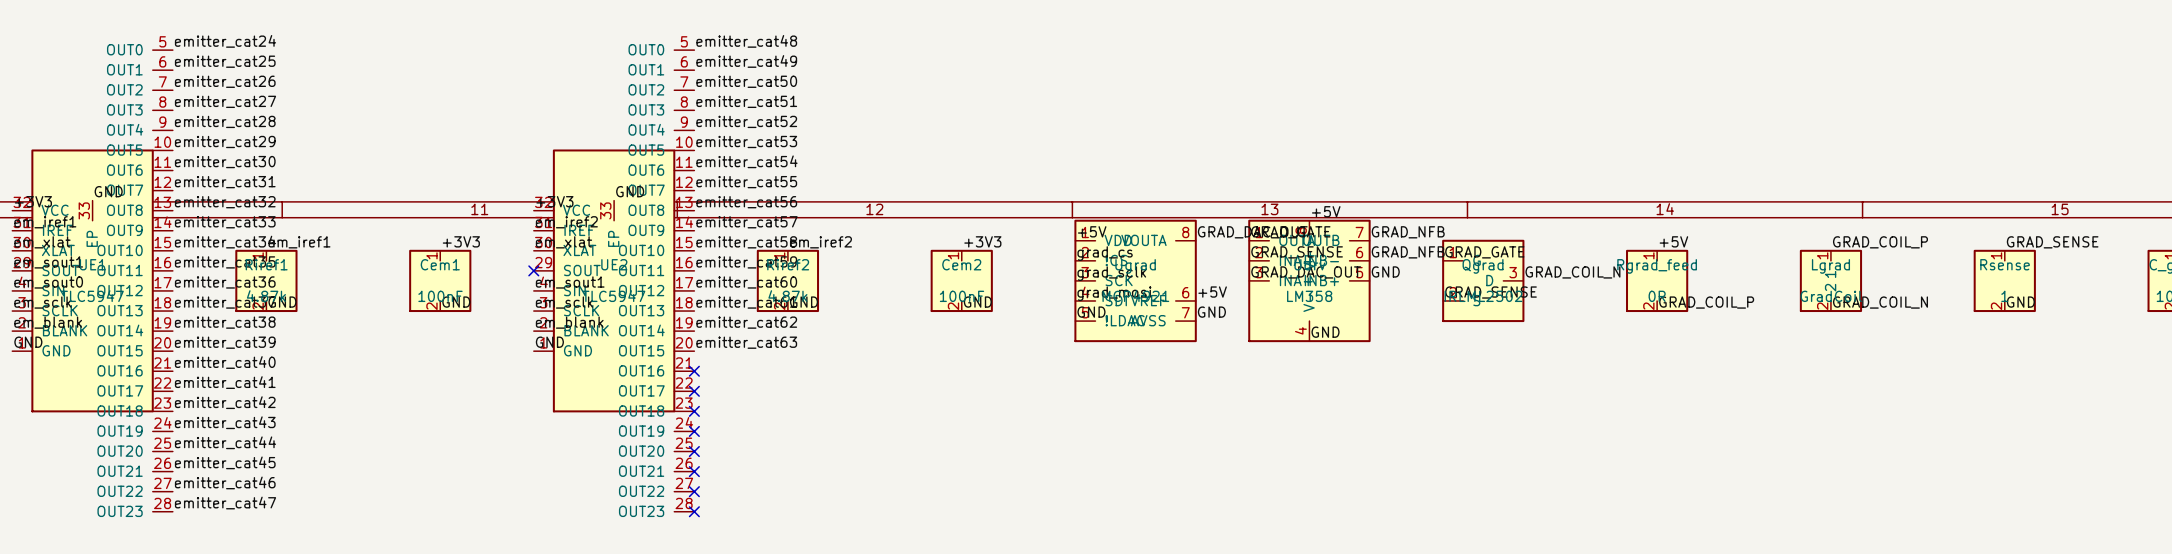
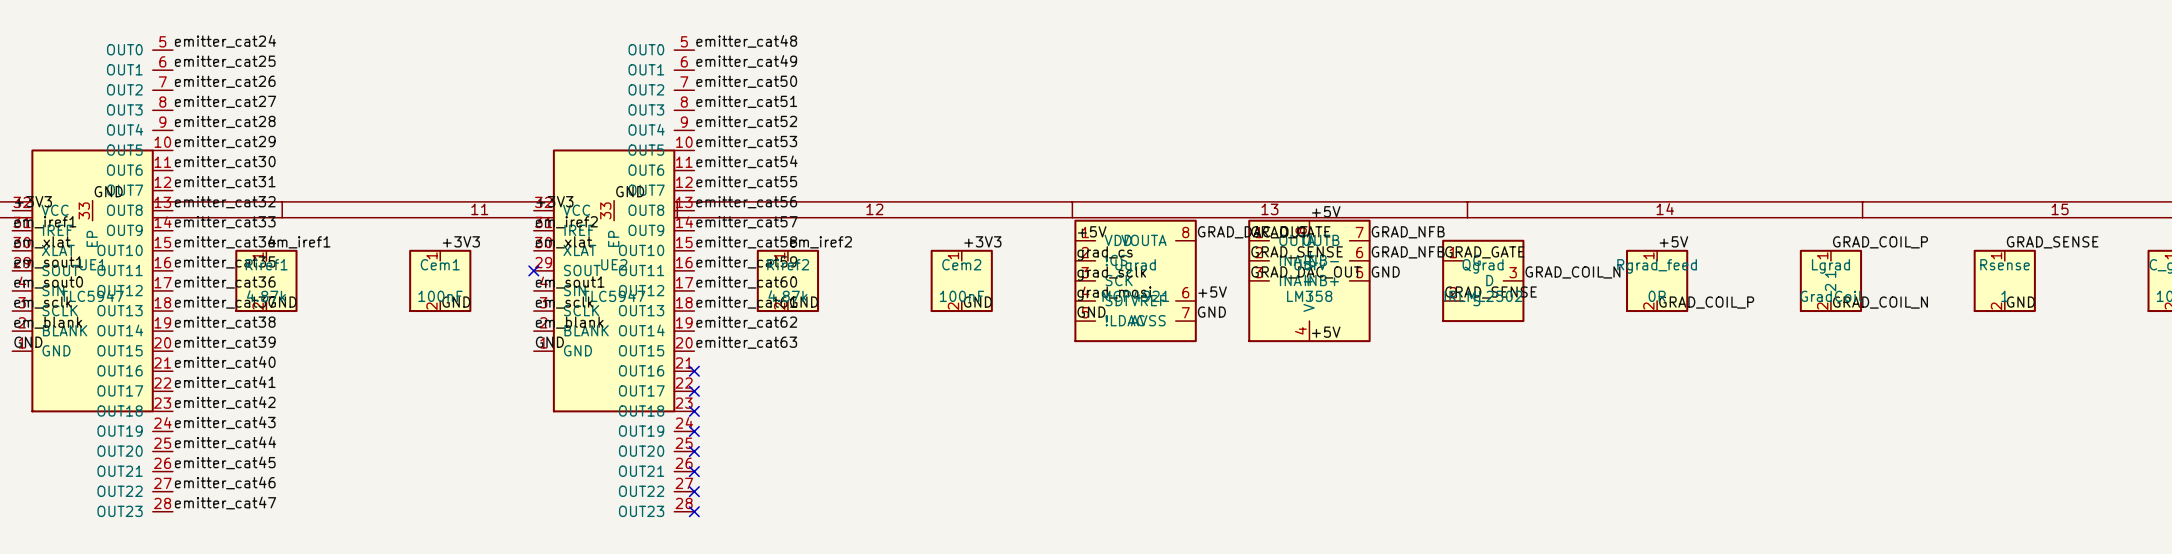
label: GND (1325, 332) -> +5V (1326, 332)

